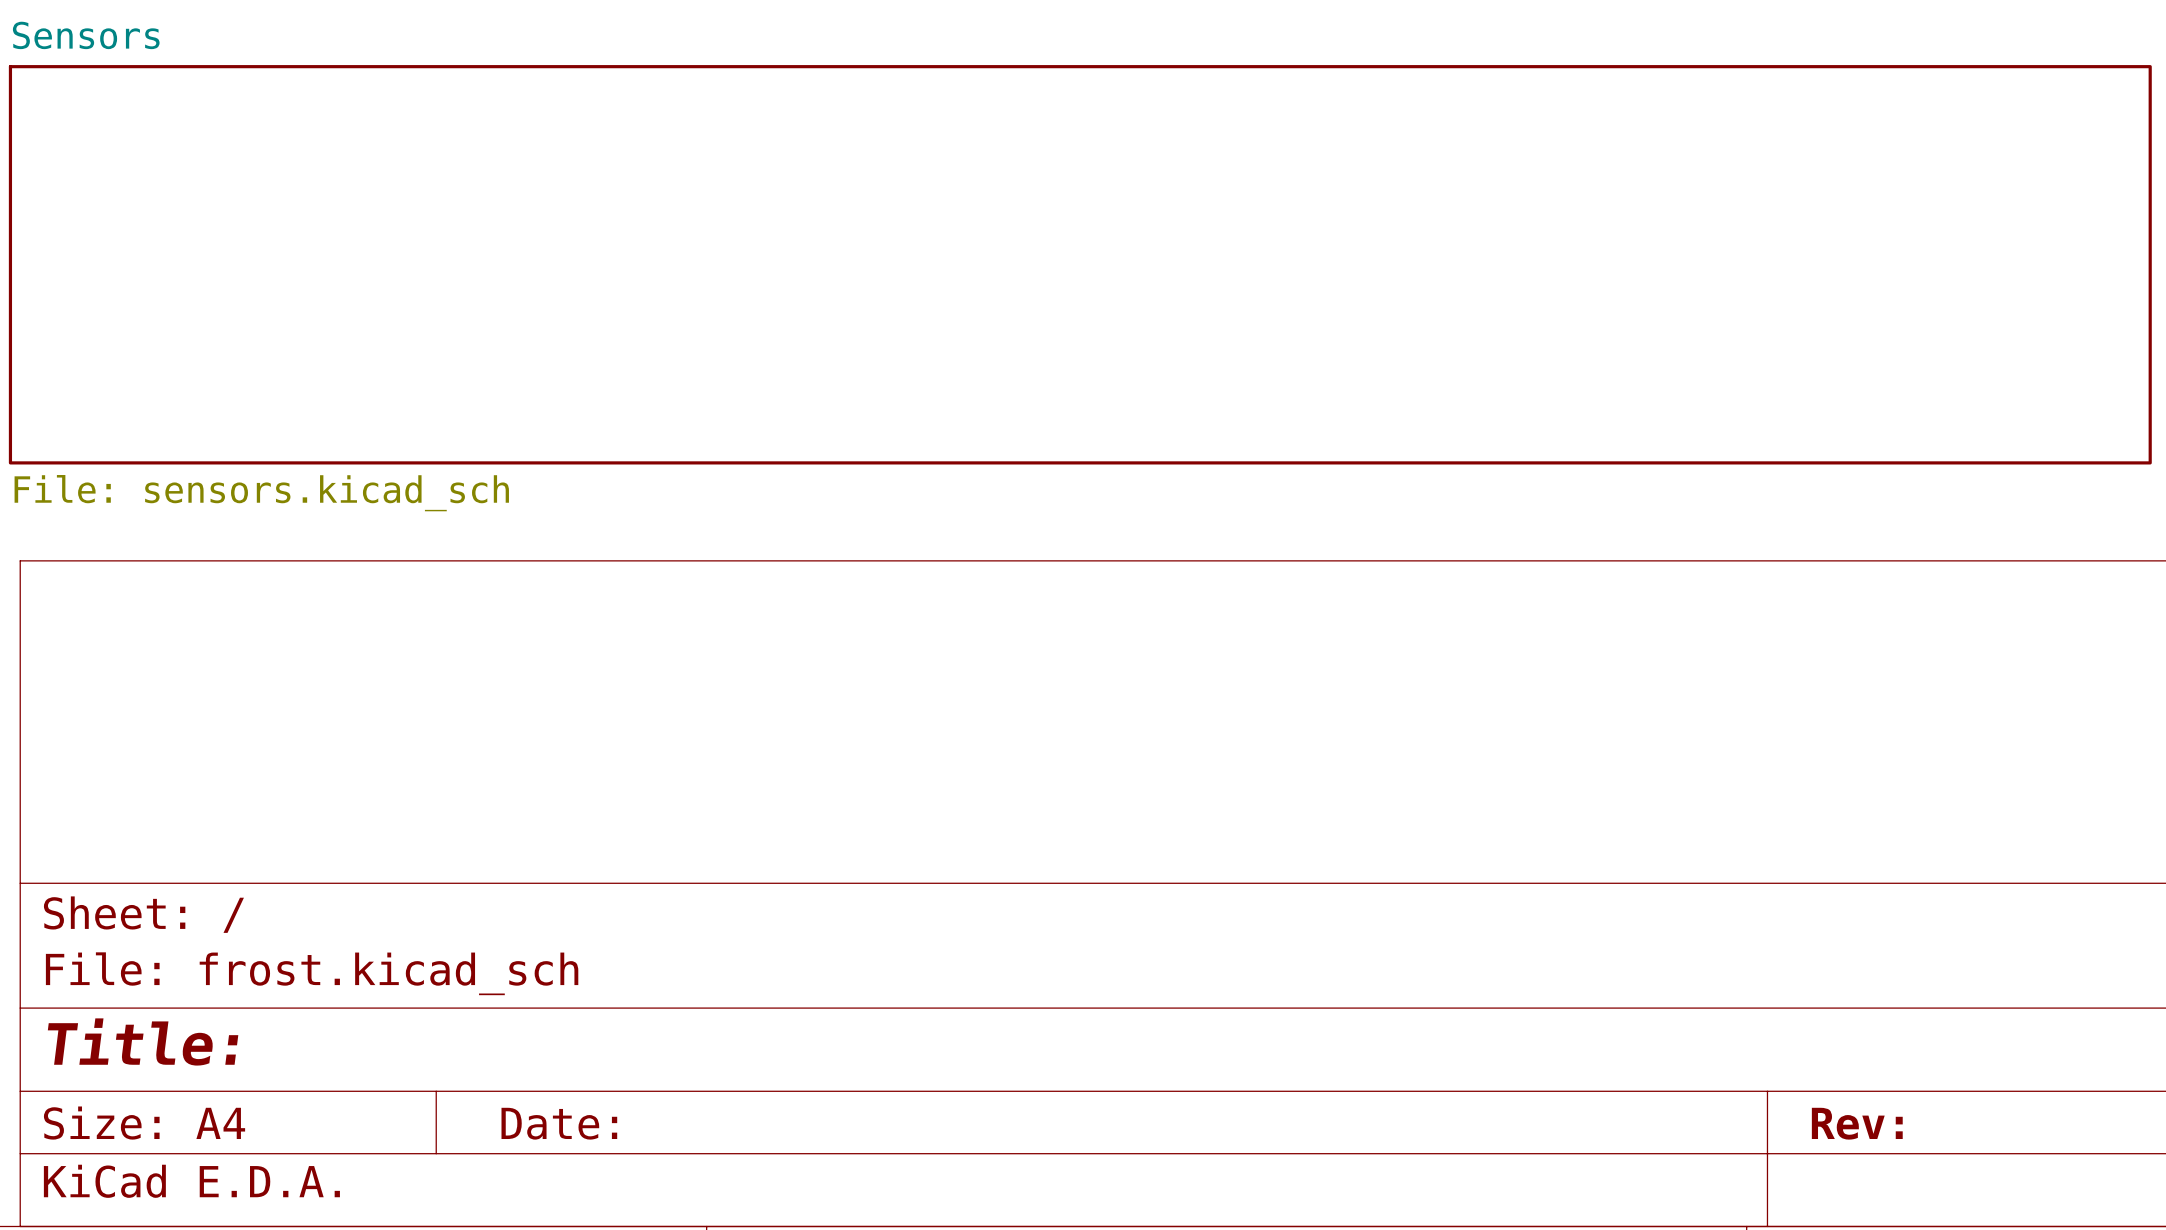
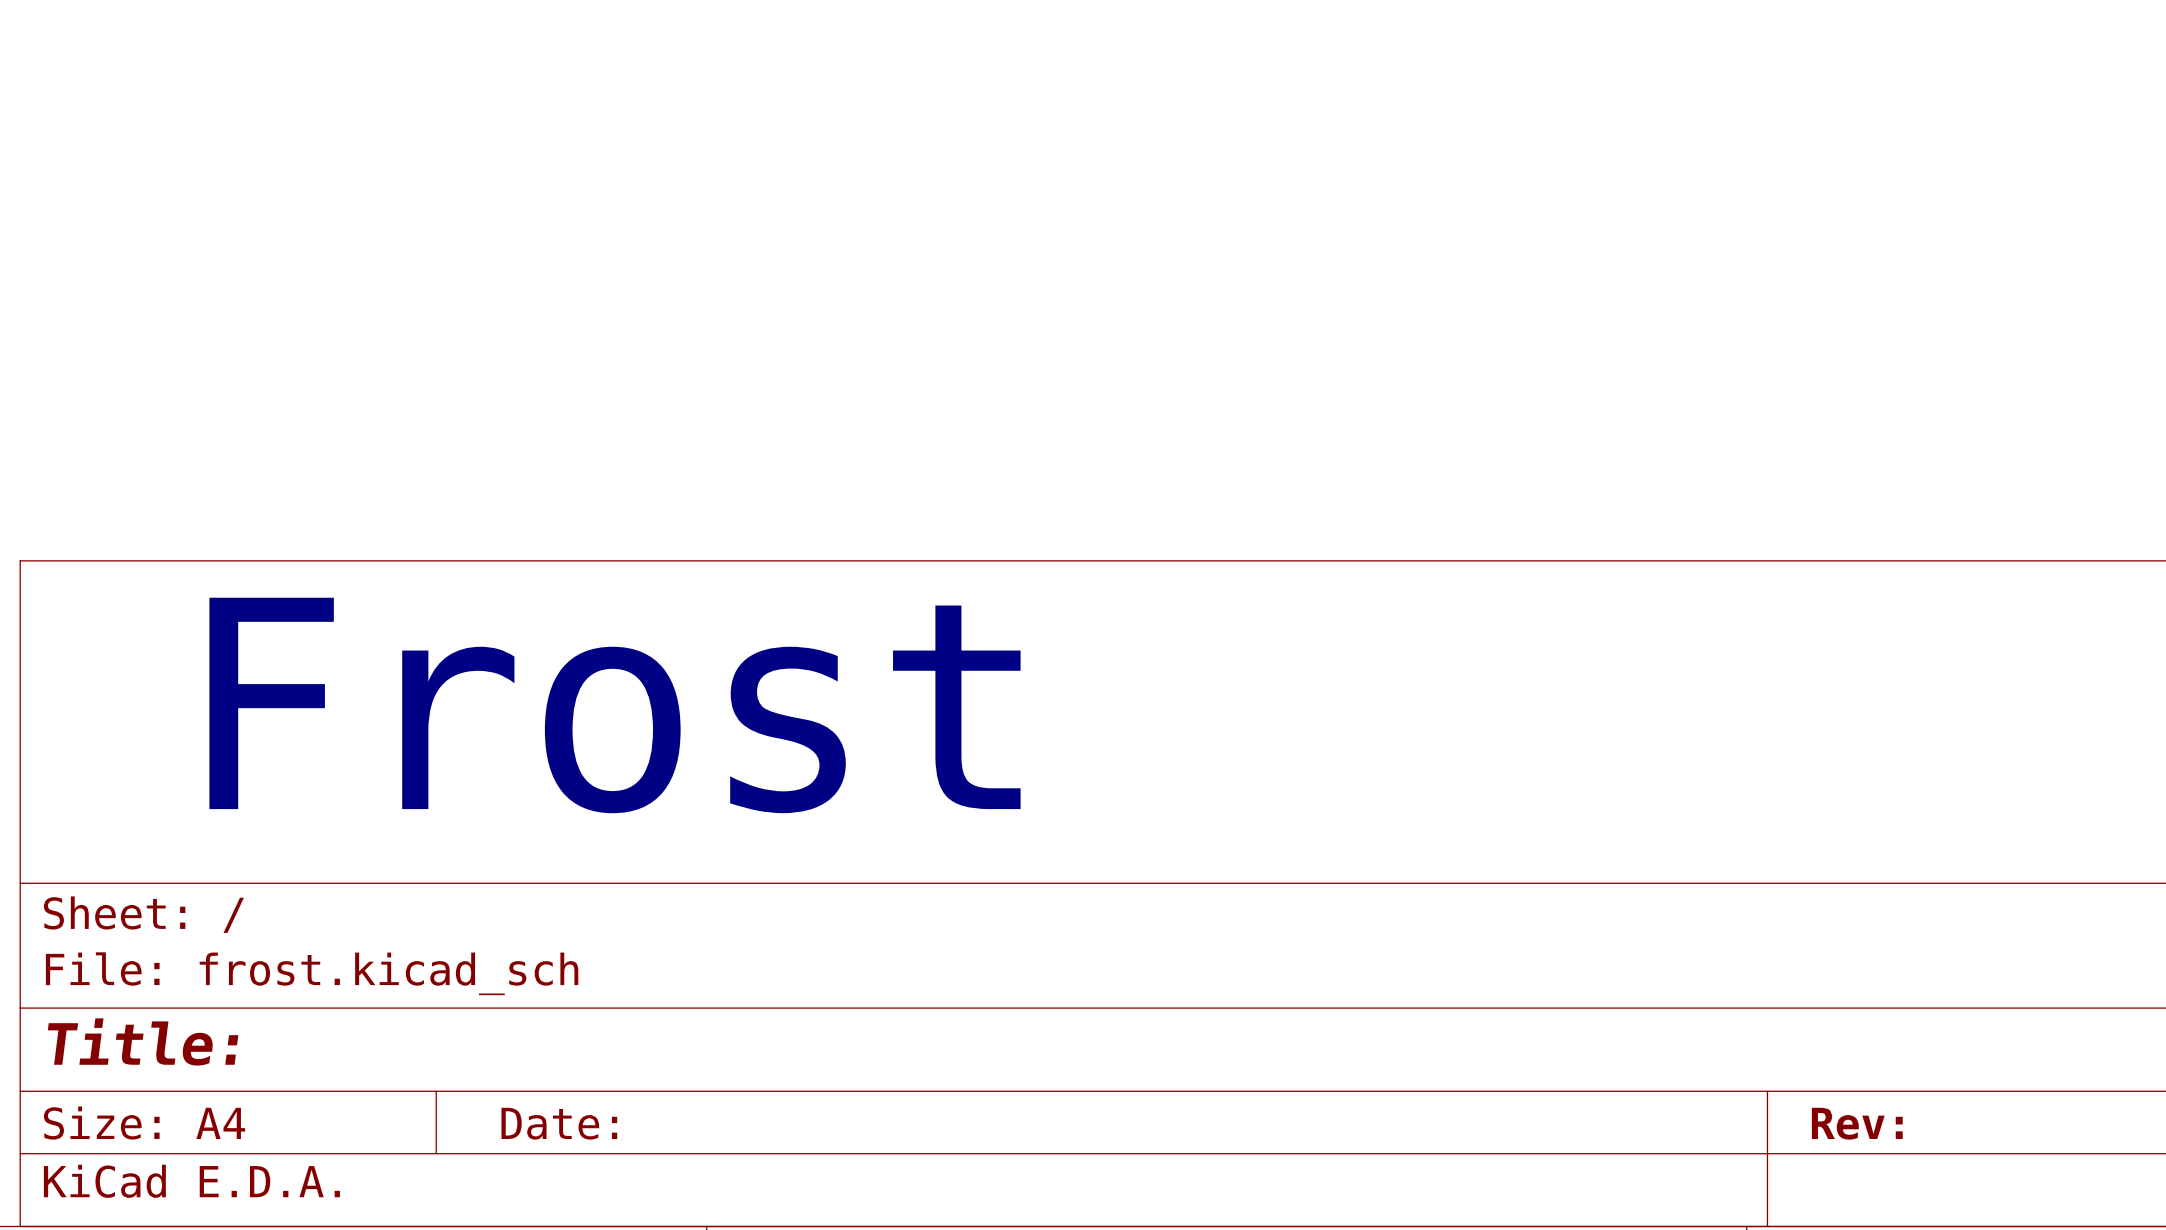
sheet Sensors: File: sensors.kicad_sch (1080, 264) -> none
text: none -> Frost (615, 705)

